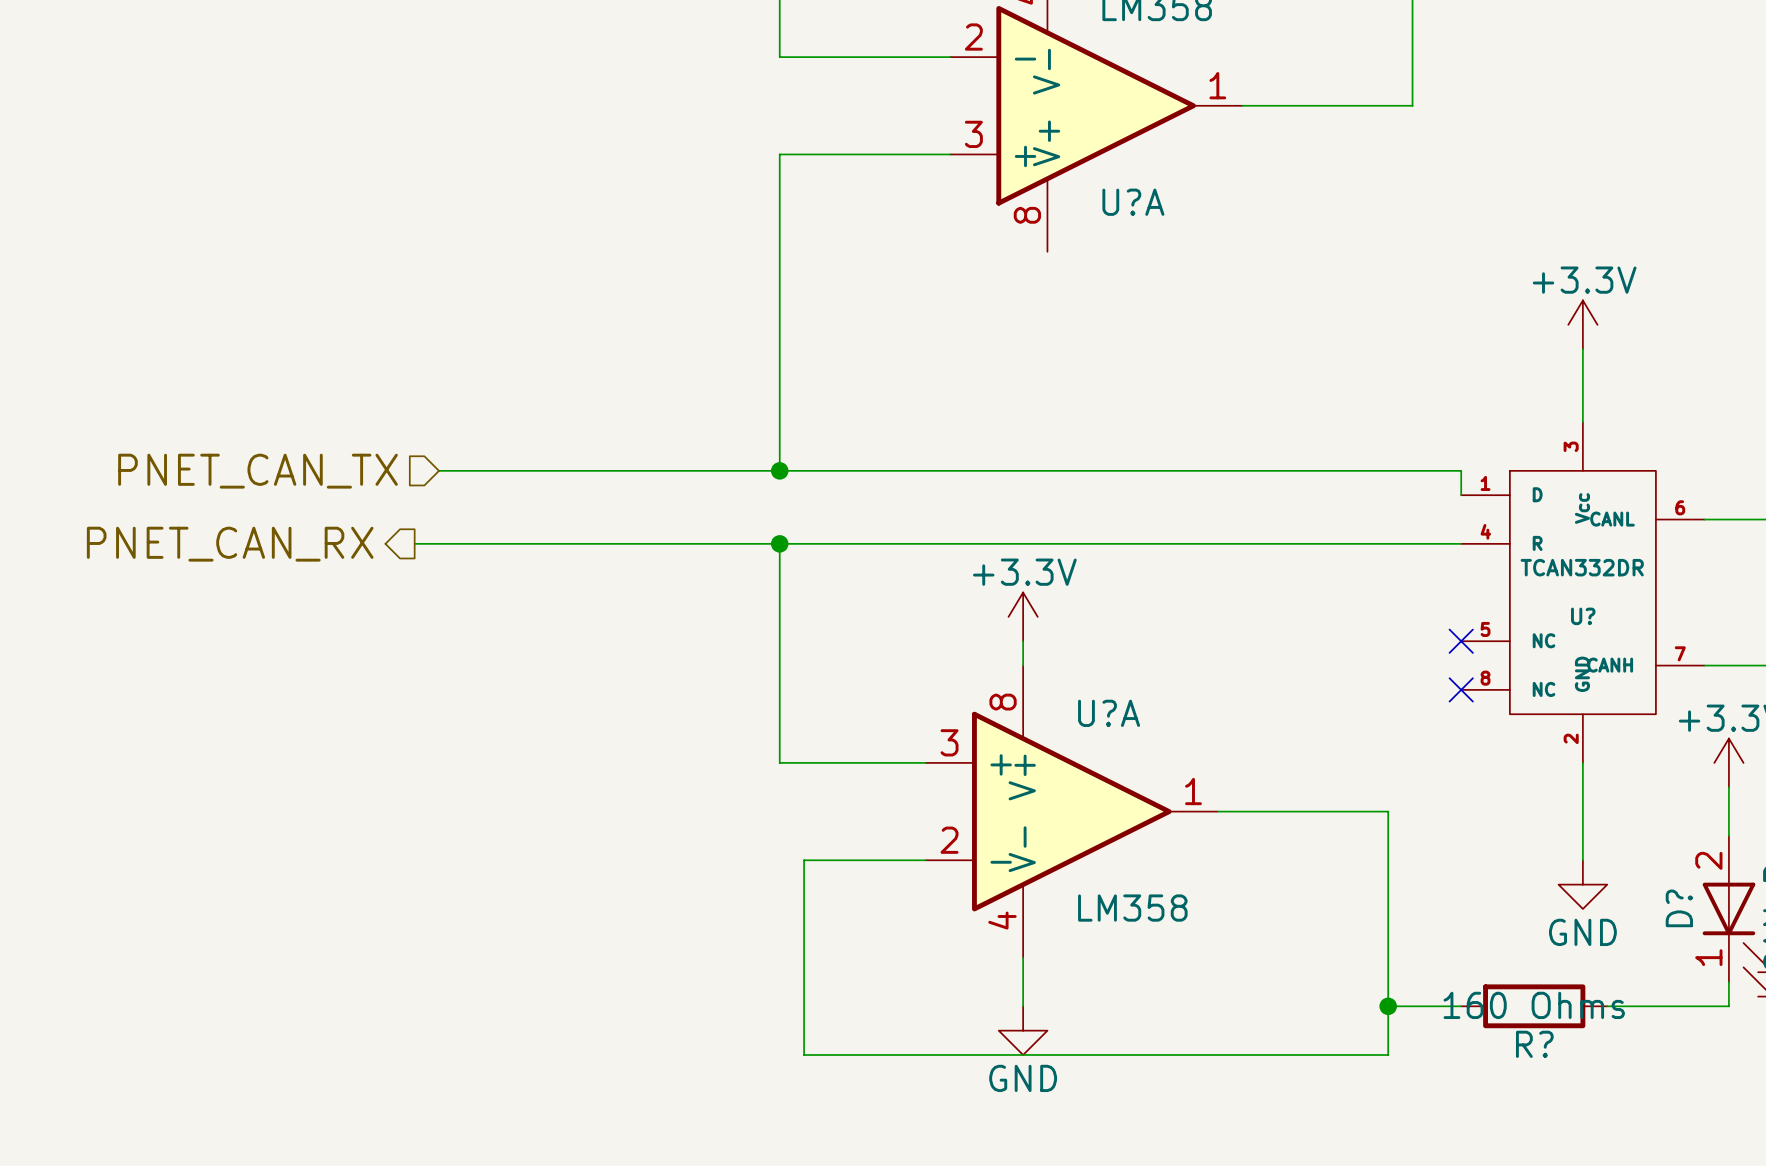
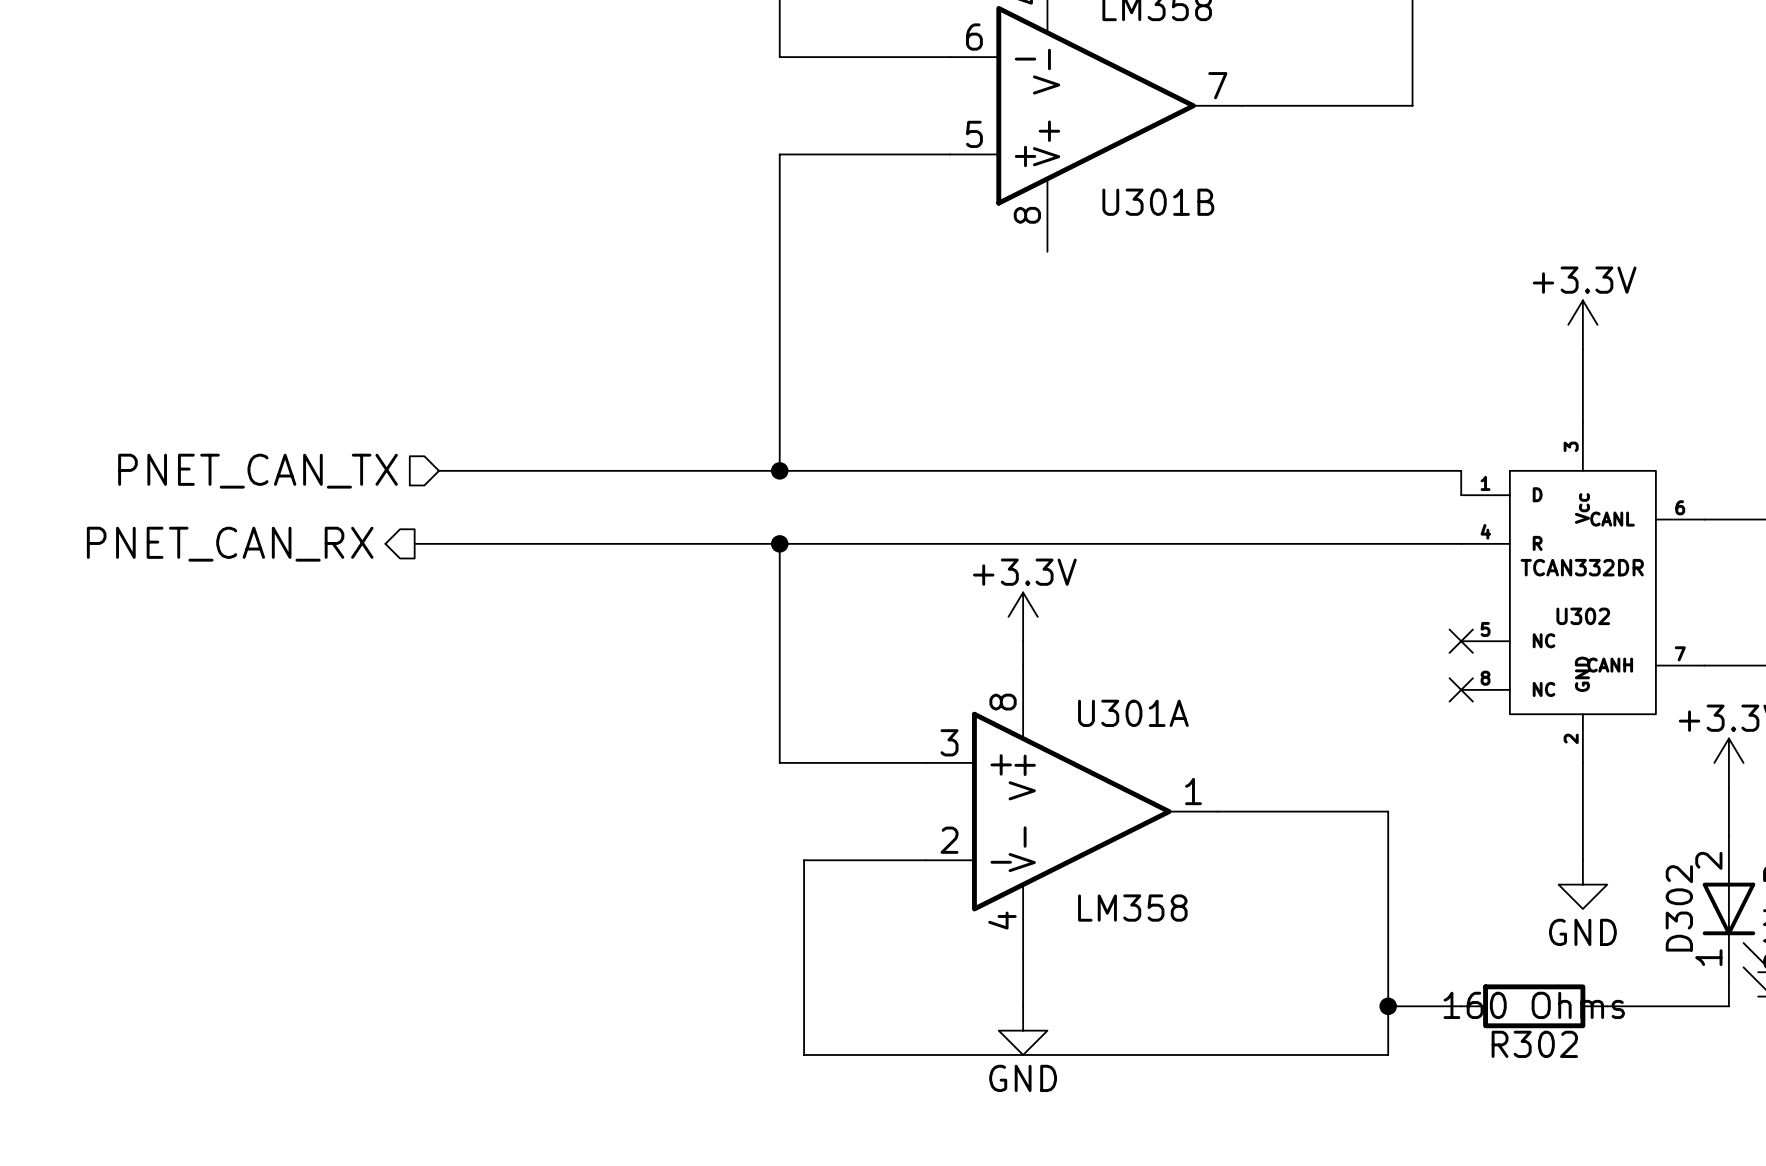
U?A pin number: 2 (973, 37) -> 6 (974, 37)
U?A pin number: 1 (1217, 85) -> 7 (1217, 85)
U?A pin number: 3 (973, 134) -> 5 (974, 134)
U?A name: U?A (1133, 202) -> U301B (1158, 202)
U? name: U? (1583, 616) -> U302 (1583, 616)
U?A name: U?A (1109, 713) -> U301A (1133, 713)
D? name: D? (1679, 908) -> D302 (1679, 908)
R? name: R? (1534, 1044) -> R302 (1534, 1044)

